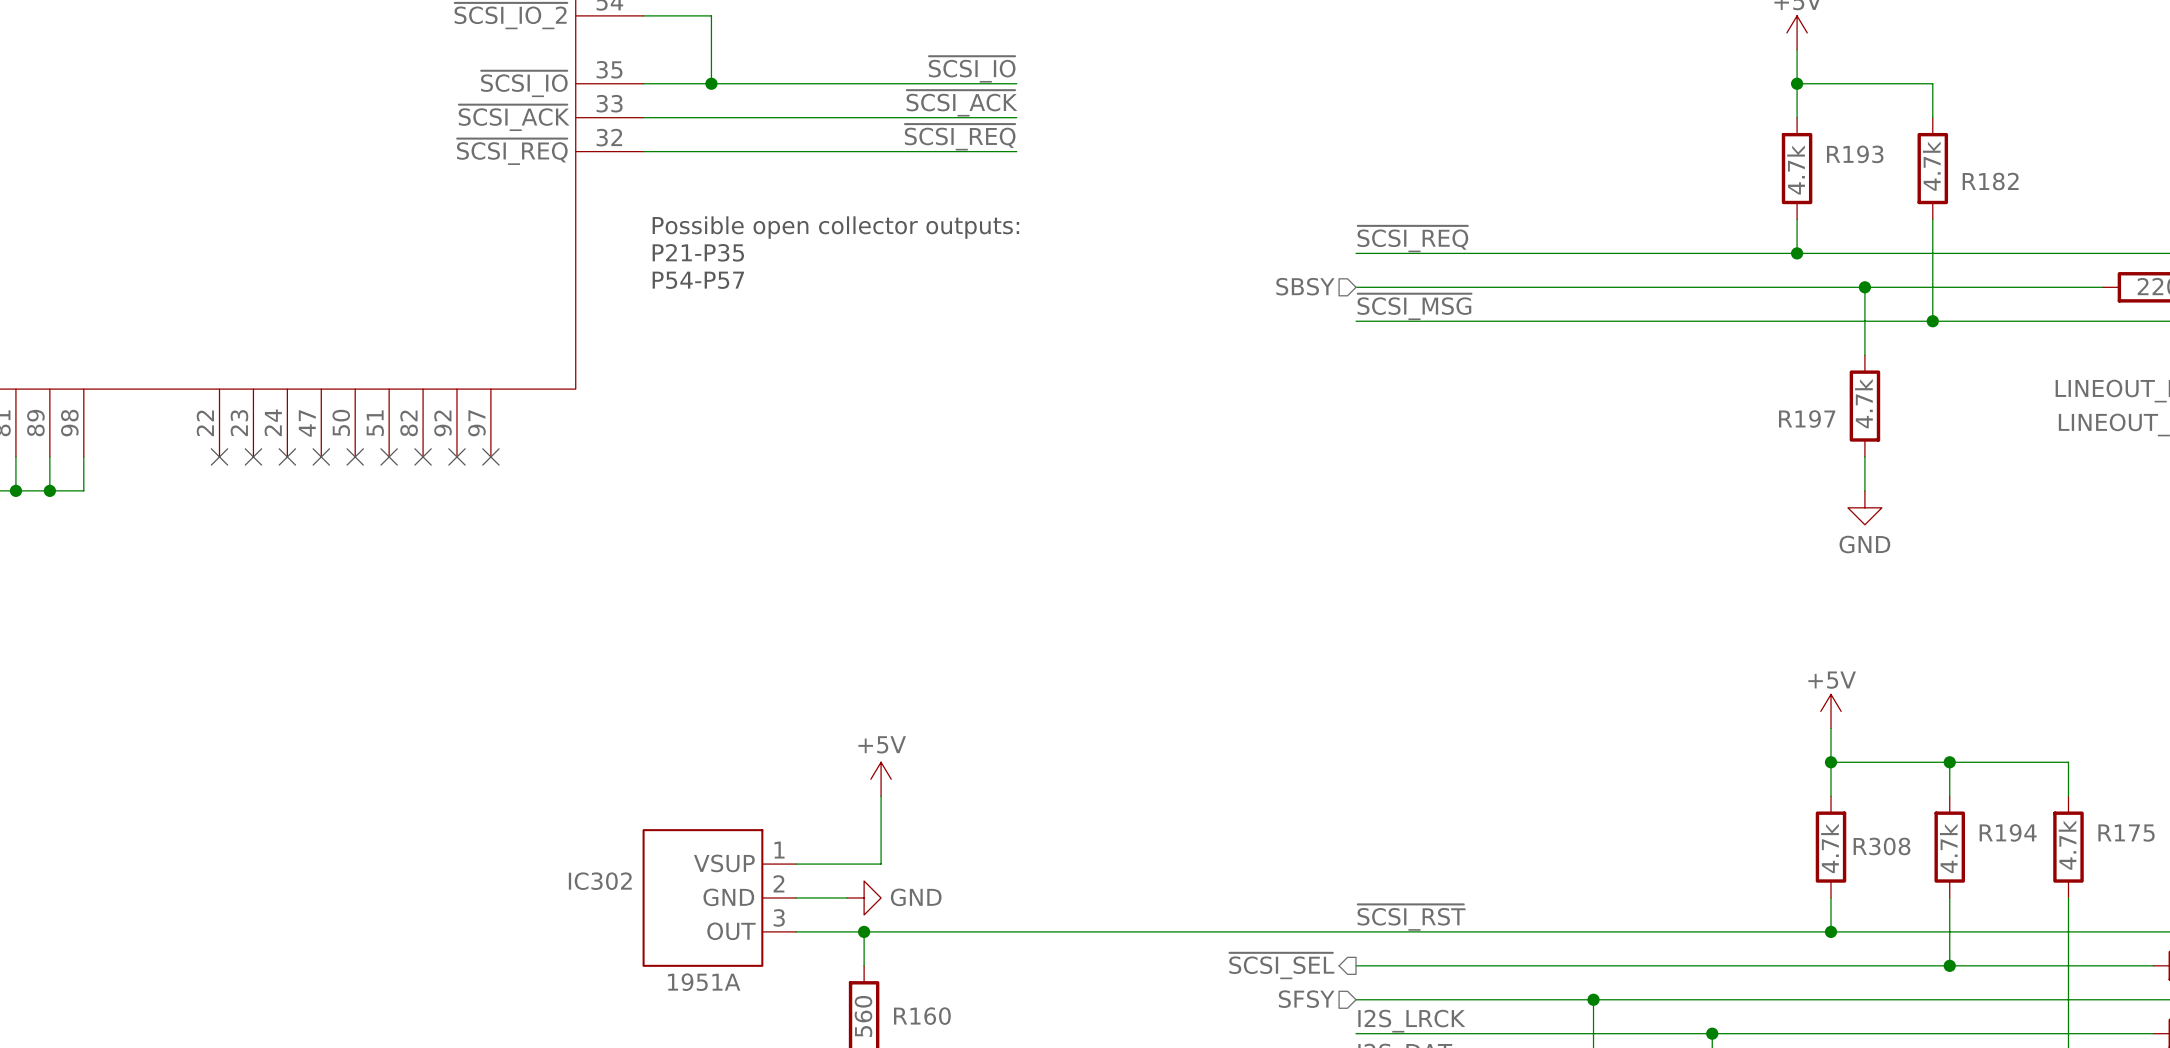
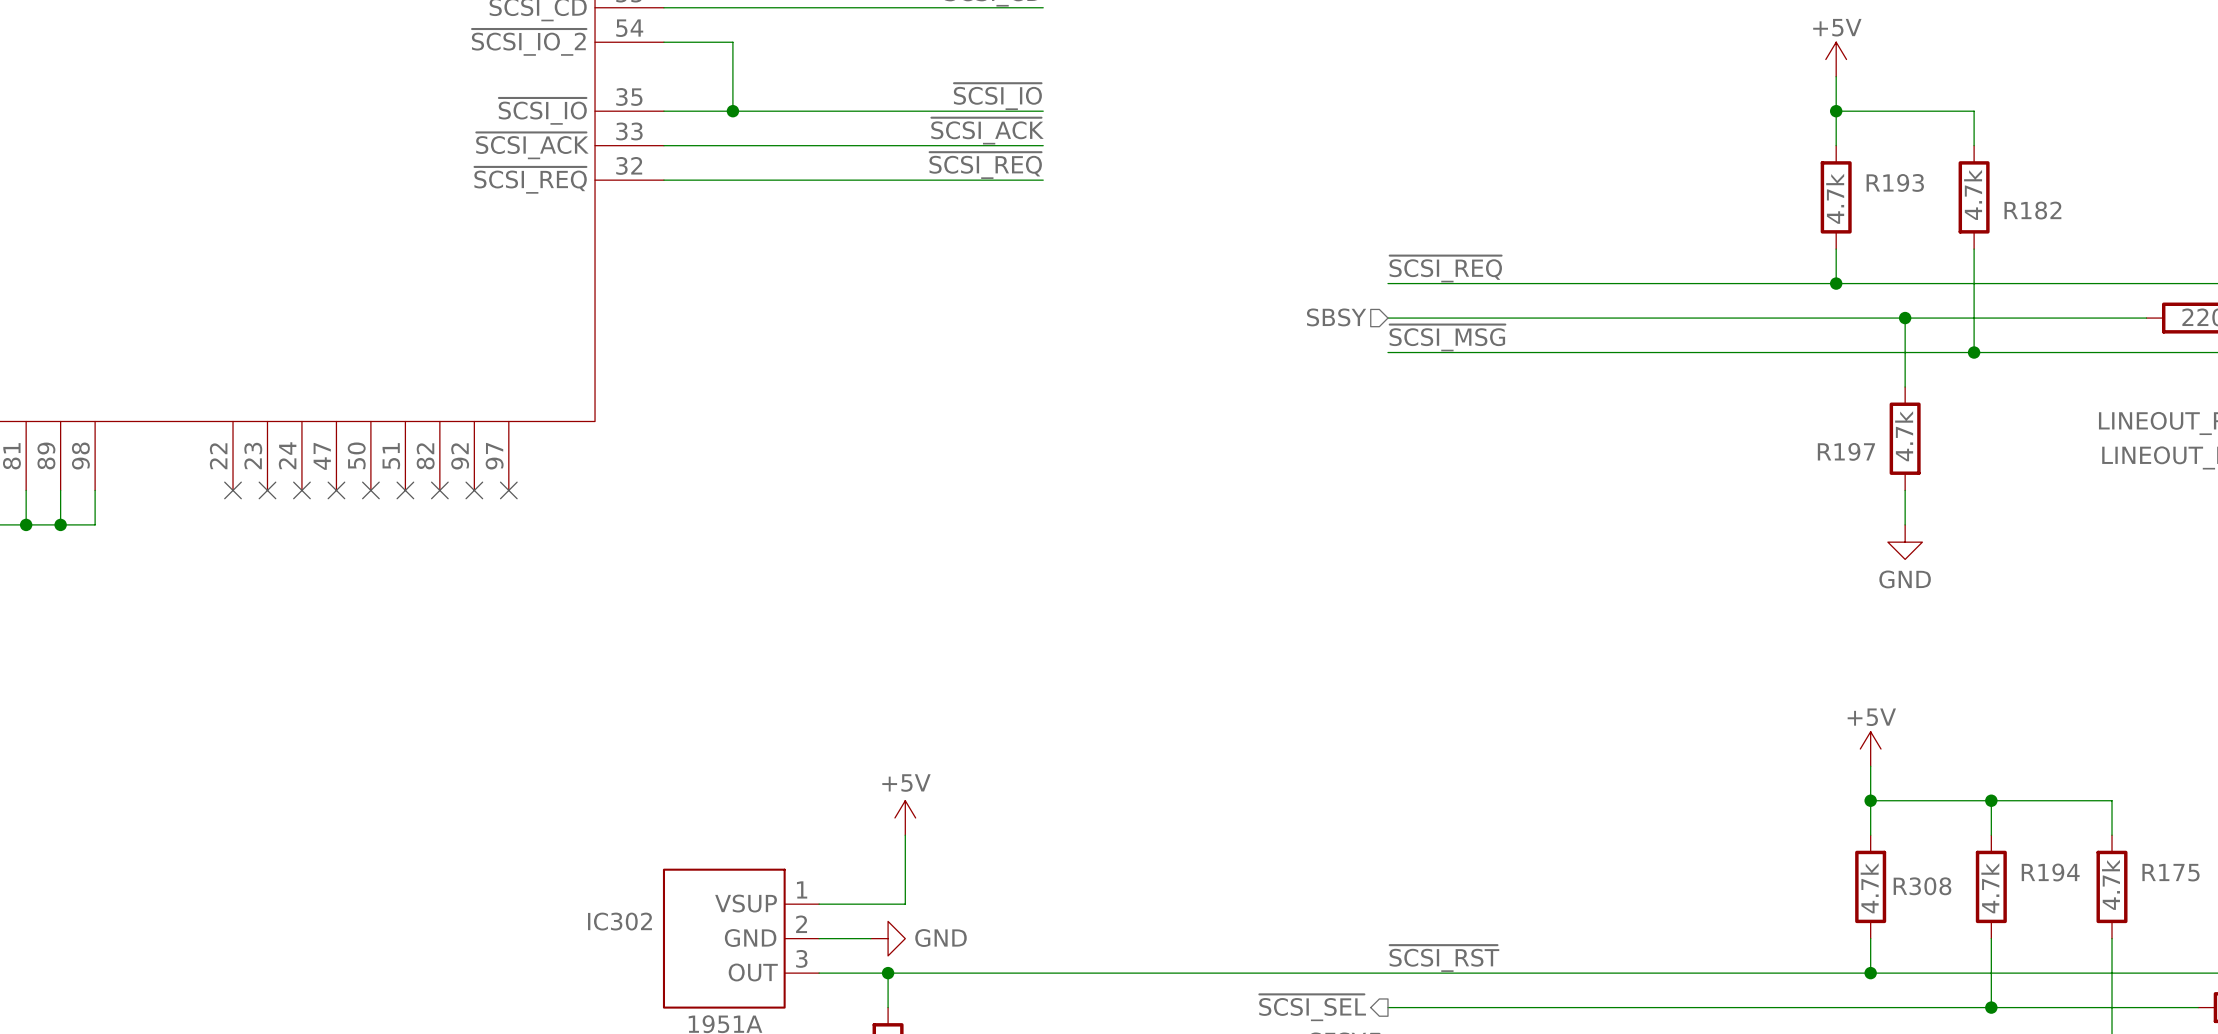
text: Possible open collector outputs: (835, 227) -> none
text: P21-P35 (698, 252) -> none
text: P54-P57 (698, 280) -> none

